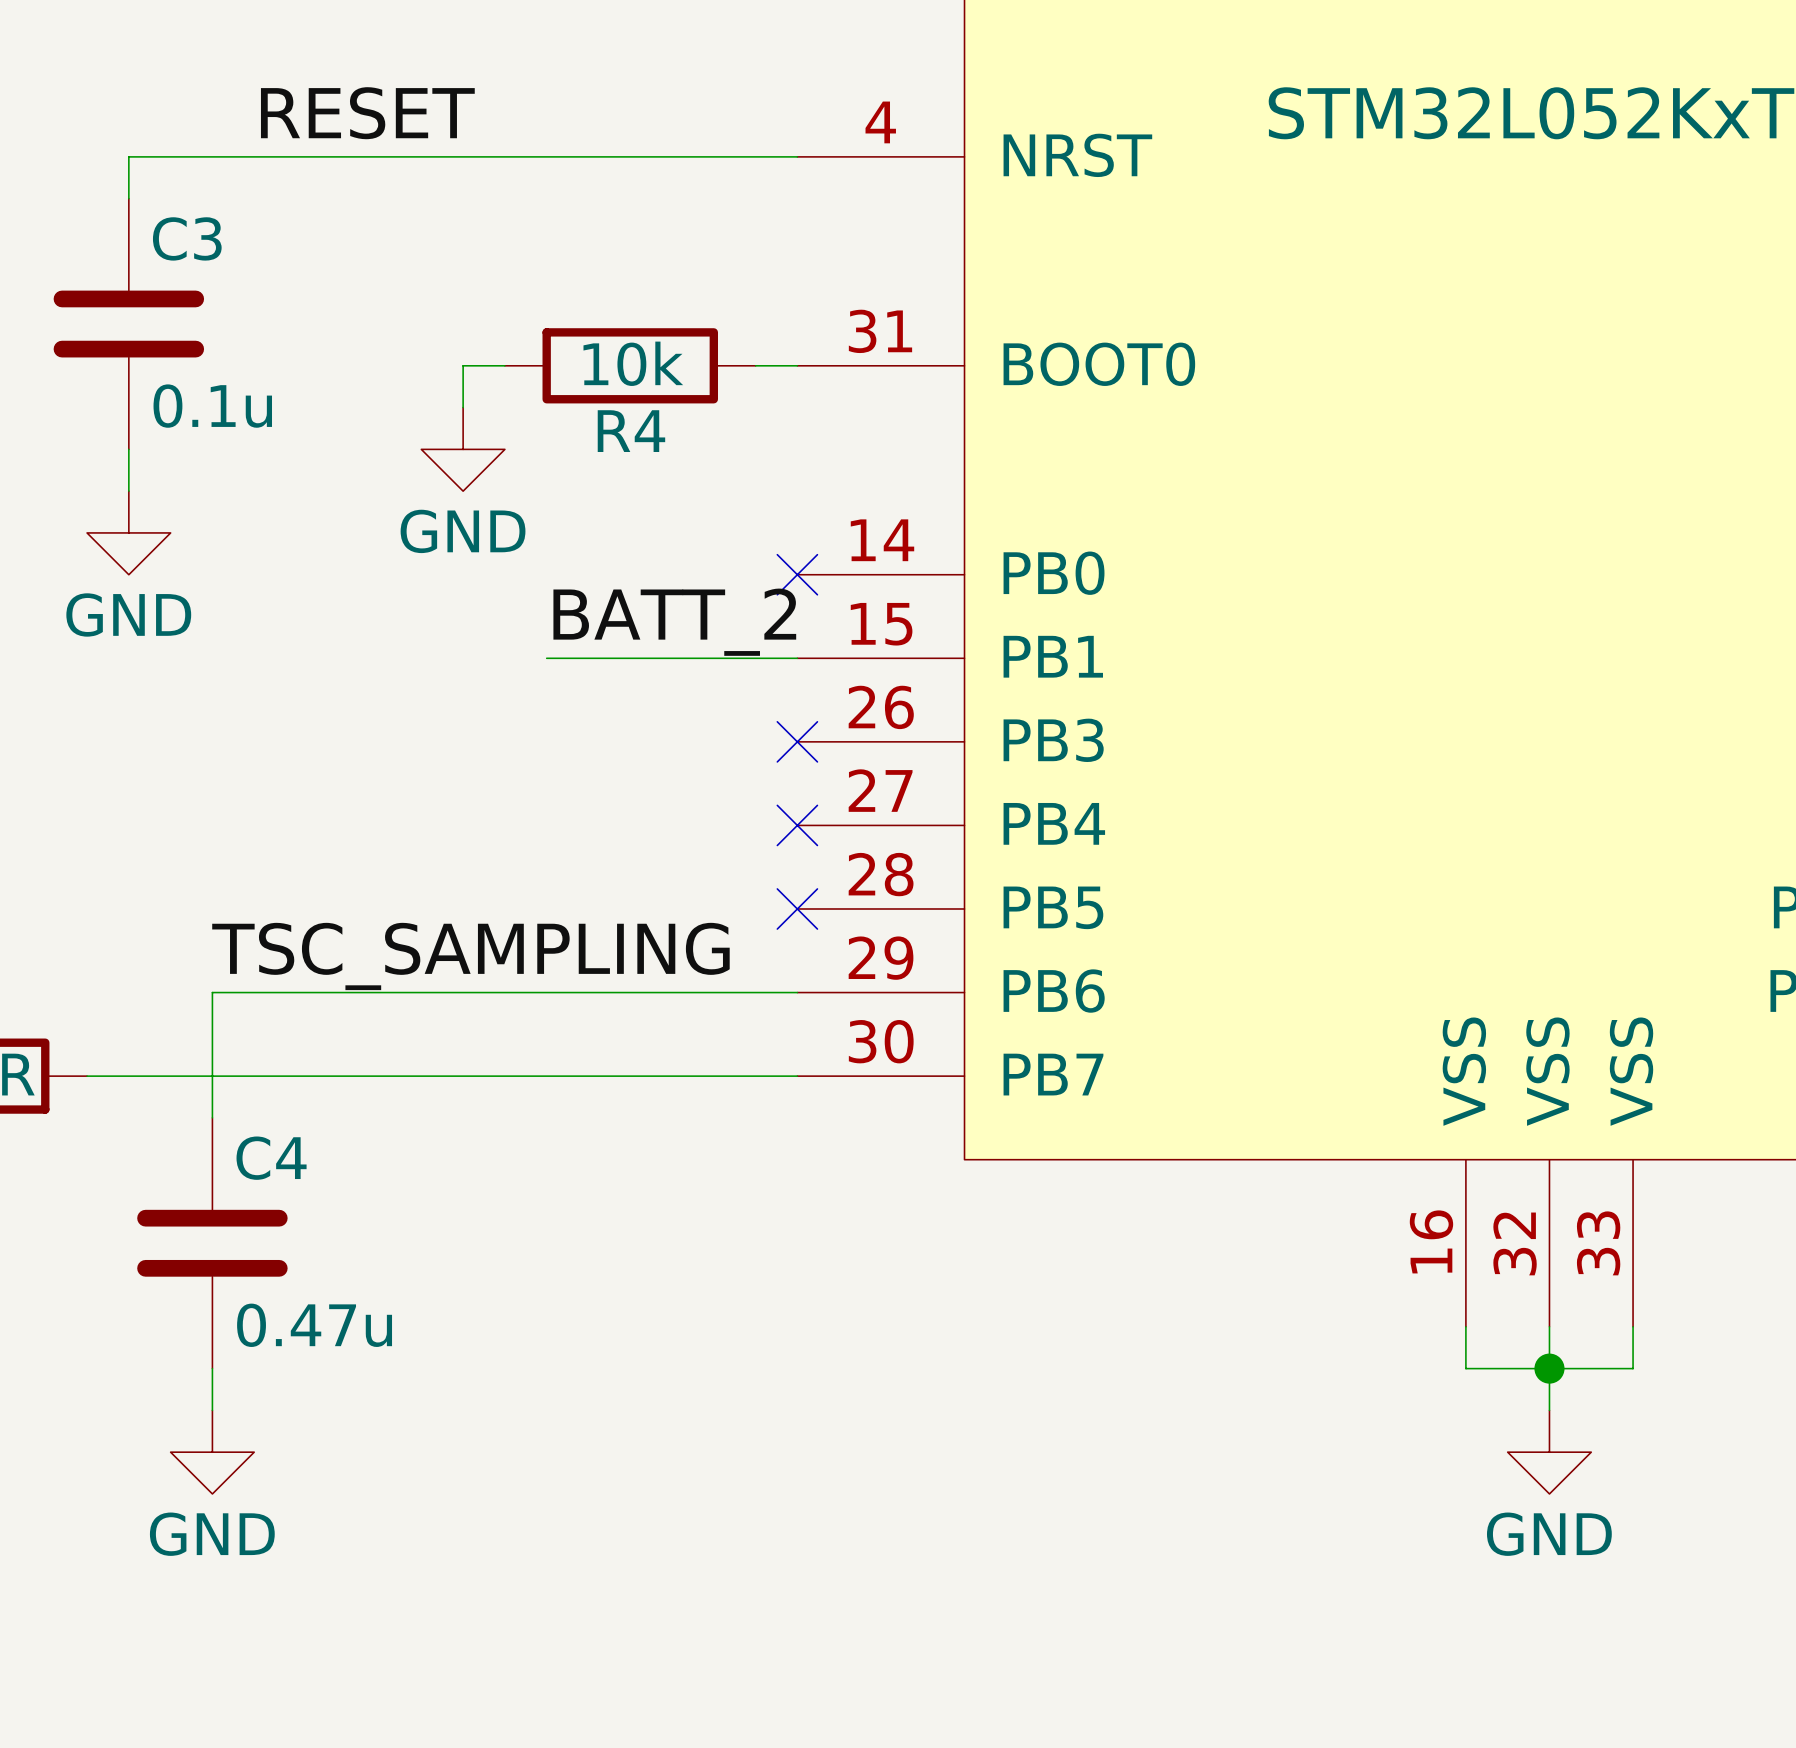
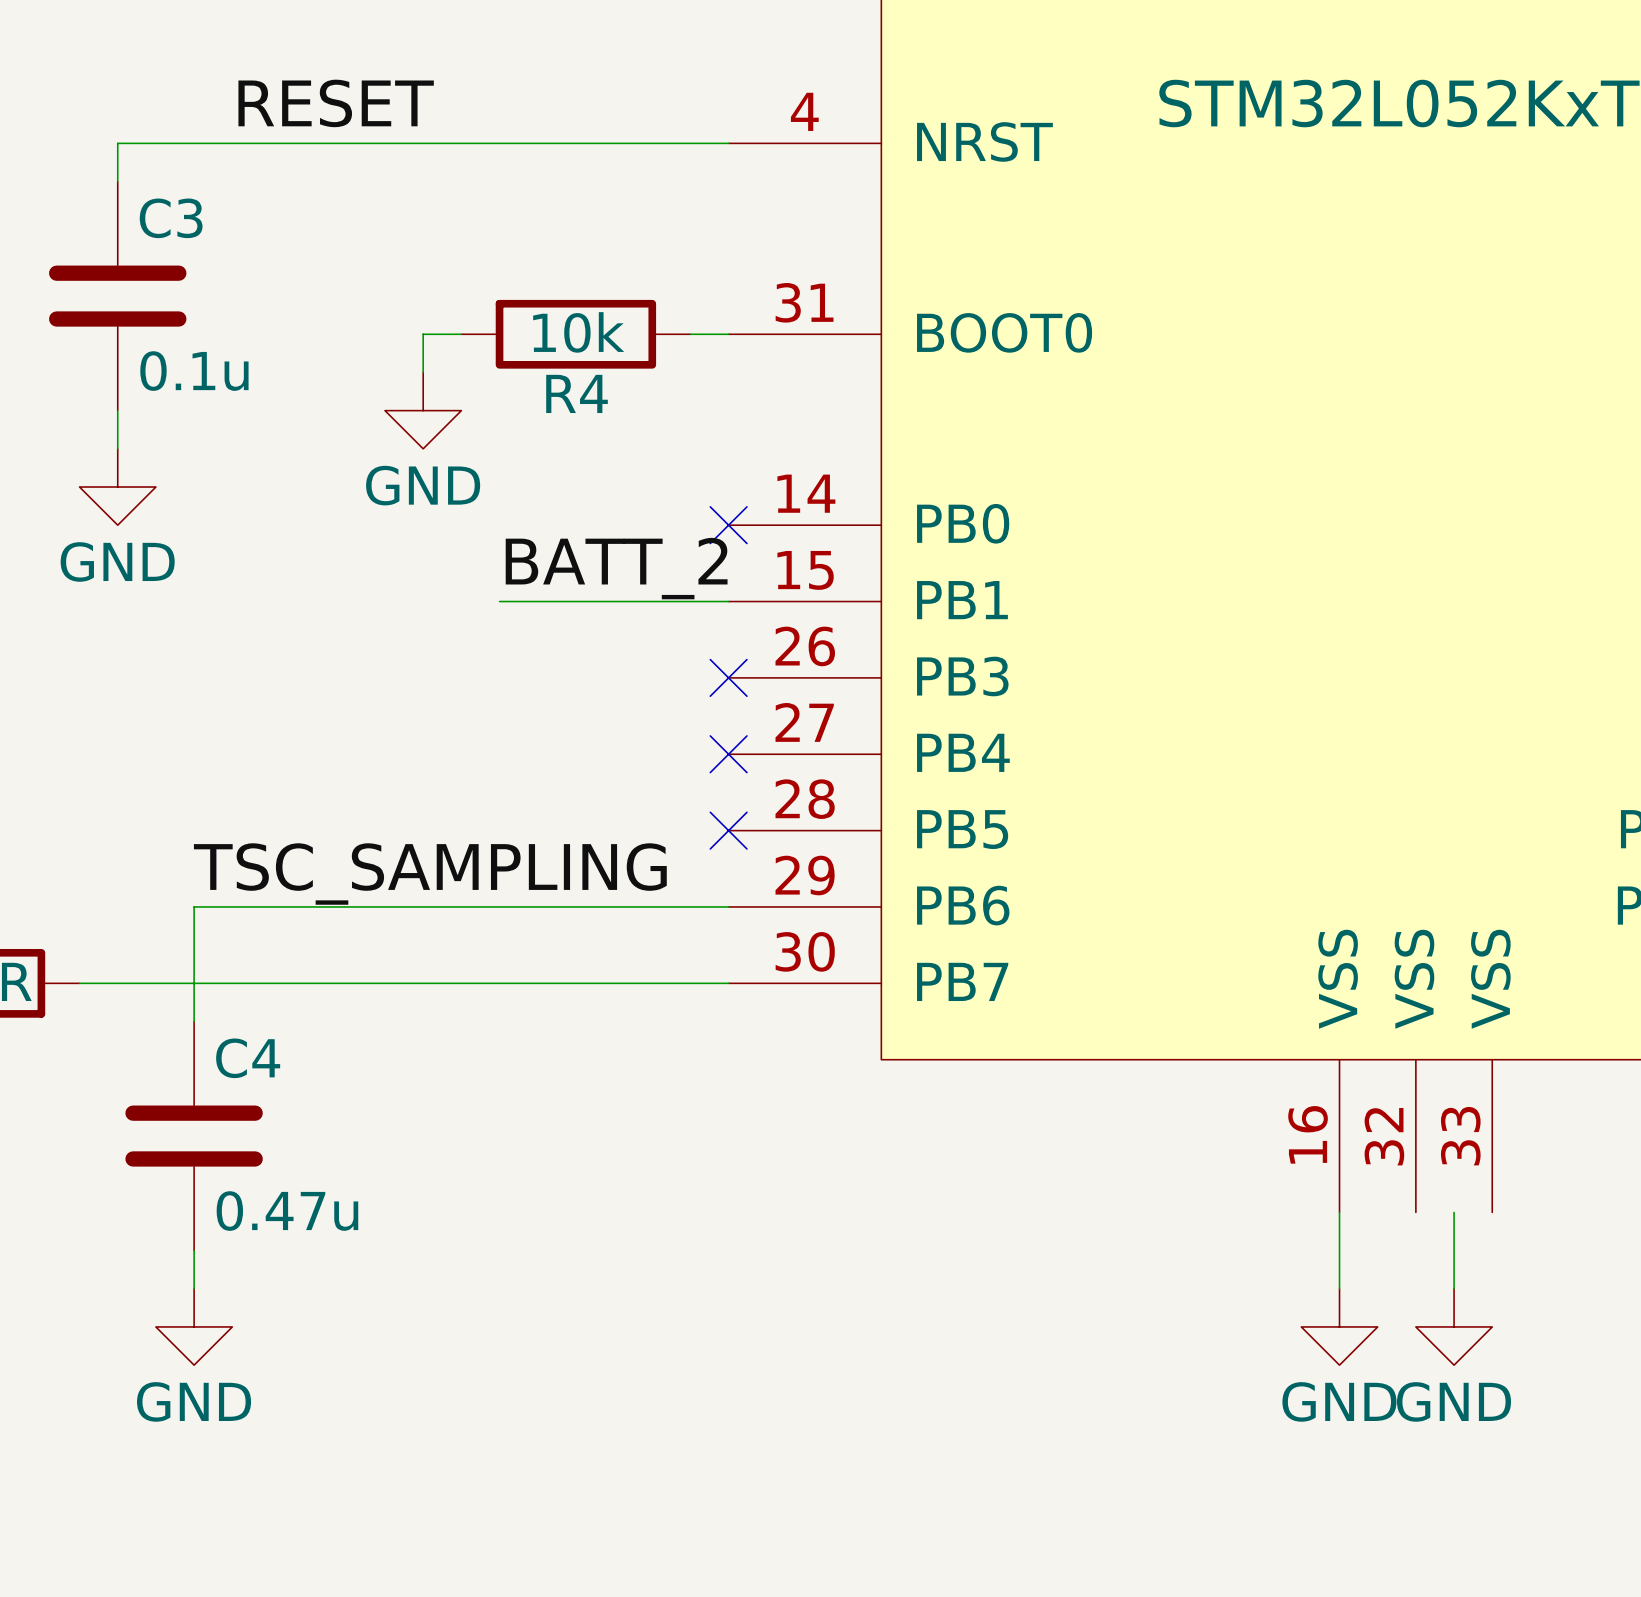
wire: (1549, 1326) (1549, 1410) -> (1454, 1212) (1454, 1288)
wire: (1633, 1326) (1633, 1368) (1465, 1368) -> (1339, 1288) (1339, 1250)
junction: (1549, 1368) -> none
power symbol: none -> GND (1339, 1326)
power symbol: GND (1549, 1452) -> none
power symbol: none -> GND (1454, 1326)

